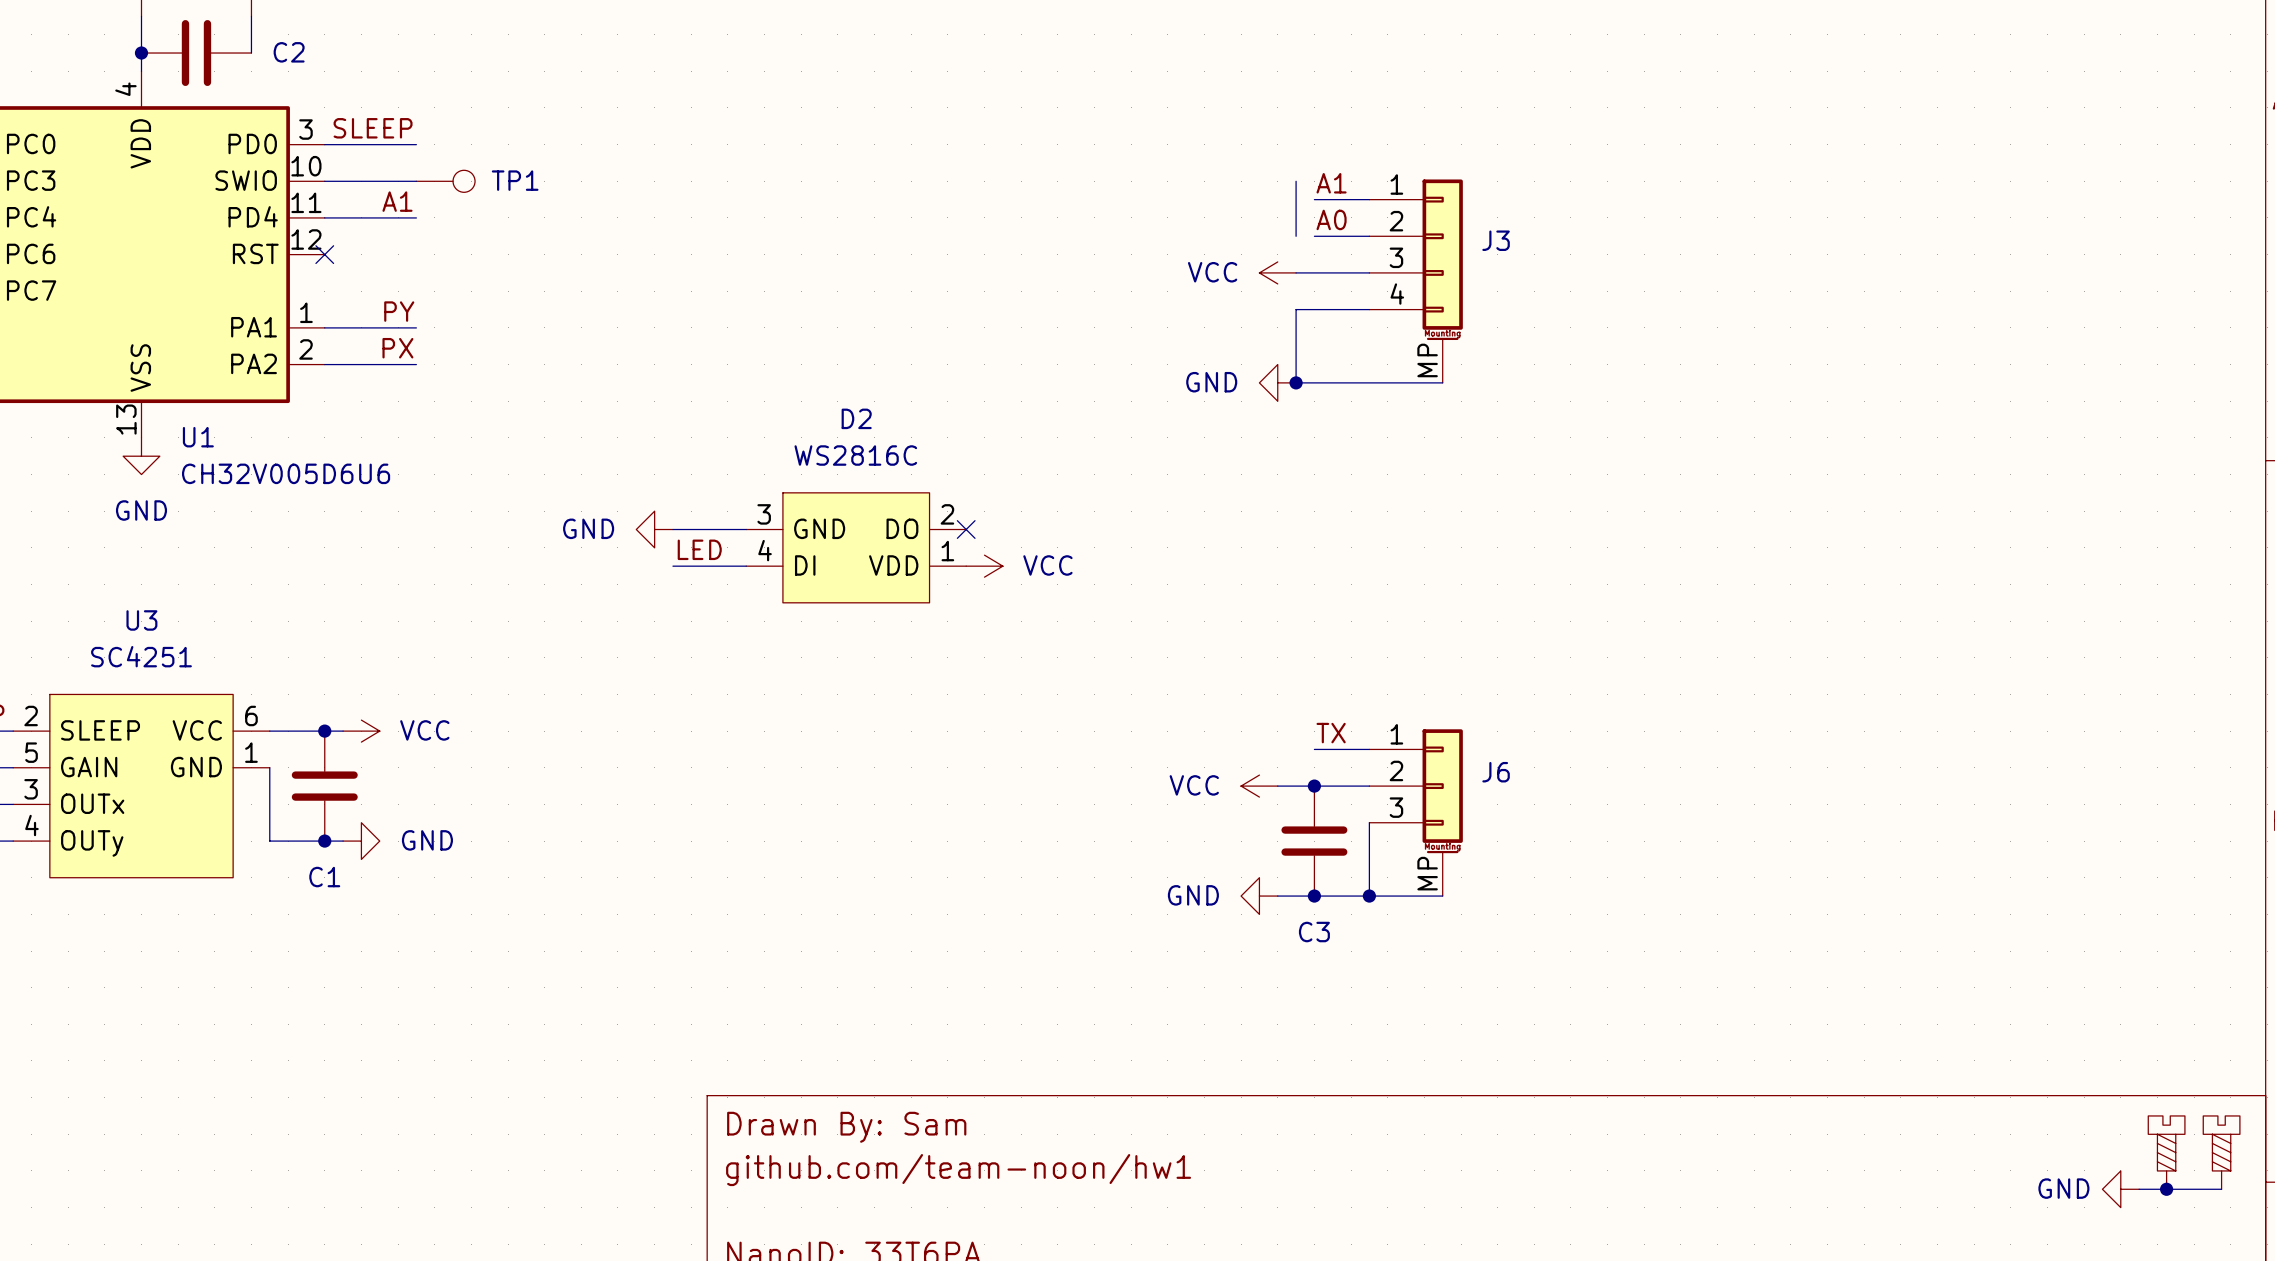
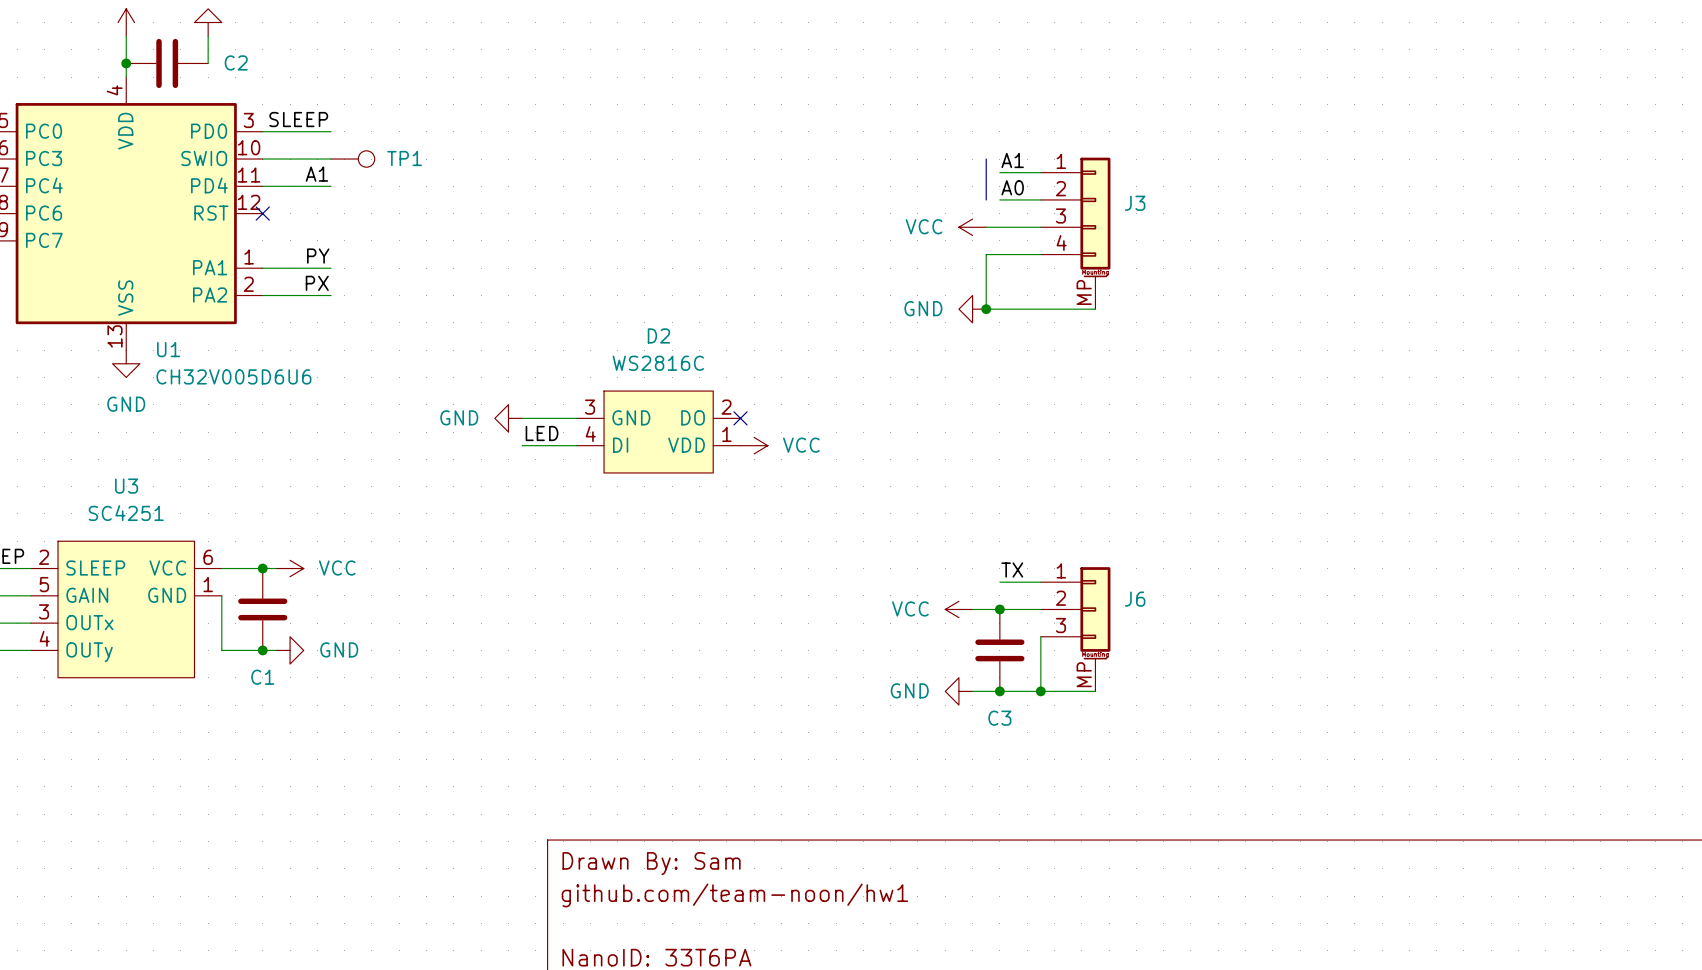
part: (2166, 1152) -> none
part: (2221, 1152) -> none
power symbol: GND (2120, 1189) -> none
wire: (2139, 1189) (2221, 1189) -> none
junction: (2166, 1189) -> none

